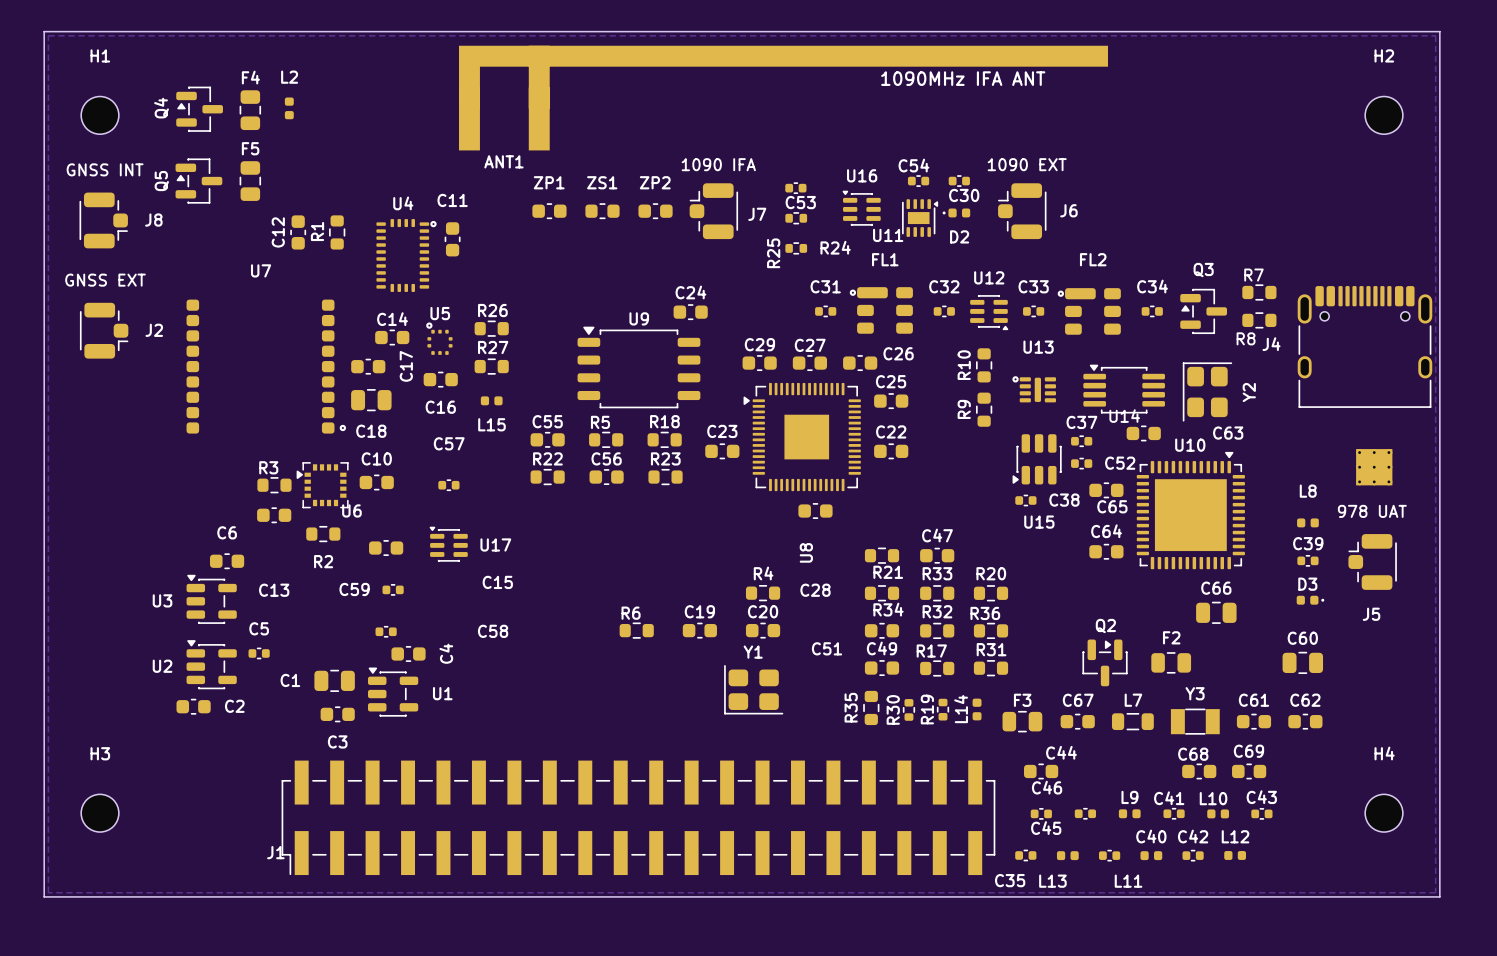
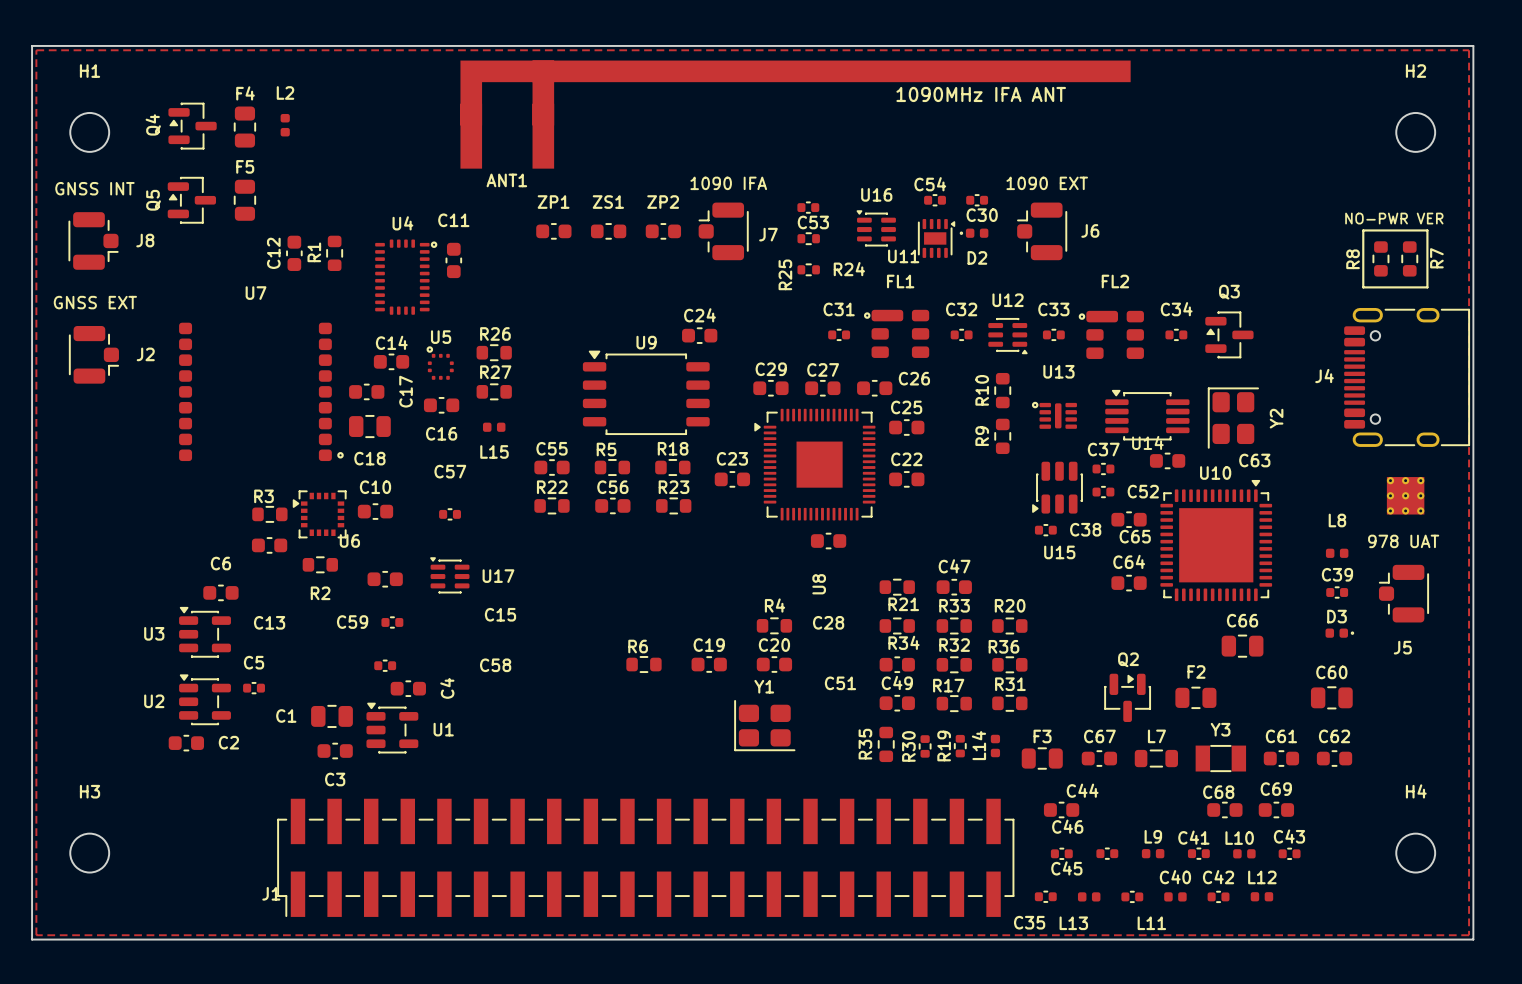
text: none -> NO-PWR VER (1394, 218)
line: none -> (1363, 230) (1427, 230) (1427, 287) (1363, 287) (1363, 230)
R7 rotation: 0° (1259, 292) -> 90° clockwise (1409, 258)
R7 position: (1259, 292) -> (1409, 258)
R8 rotation: 0° (1259, 320) -> 90° clockwise (1380, 258)
R8 position: (1259, 320) -> (1380, 258)
J4 rotation: 0° (1364, 346) -> 90° counterclockwise (1407, 377)

